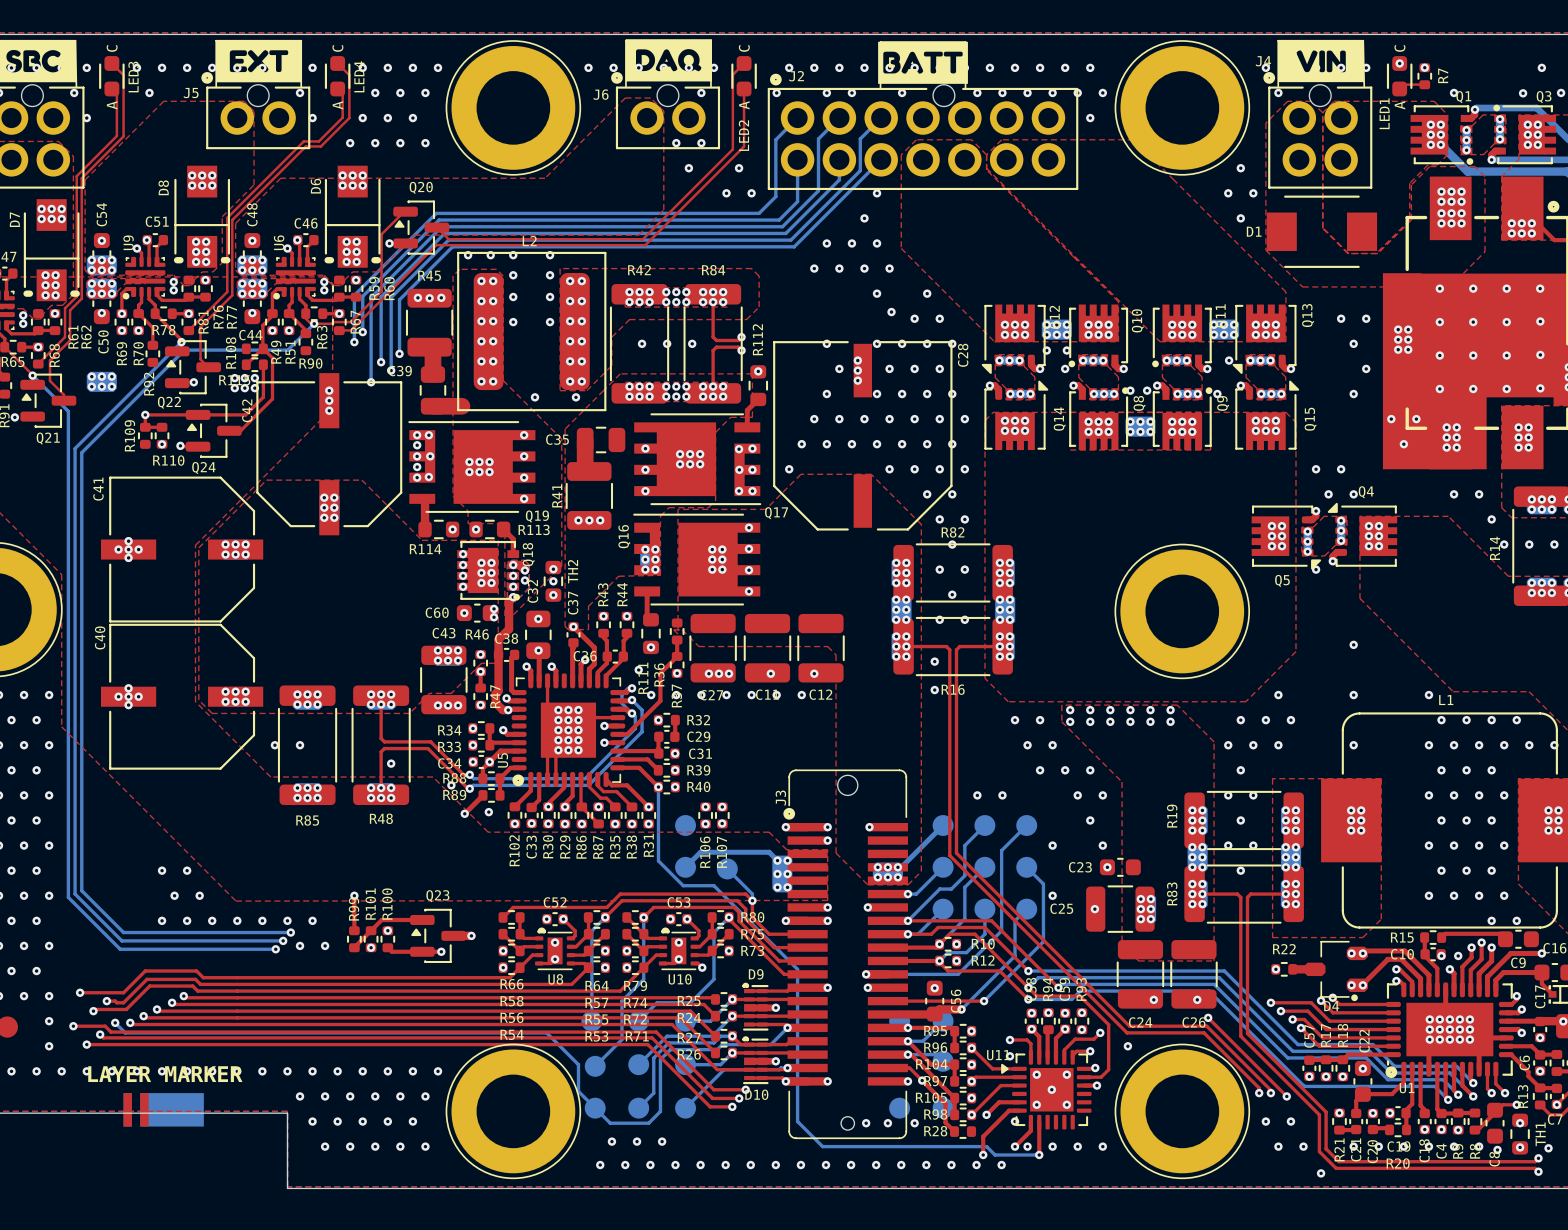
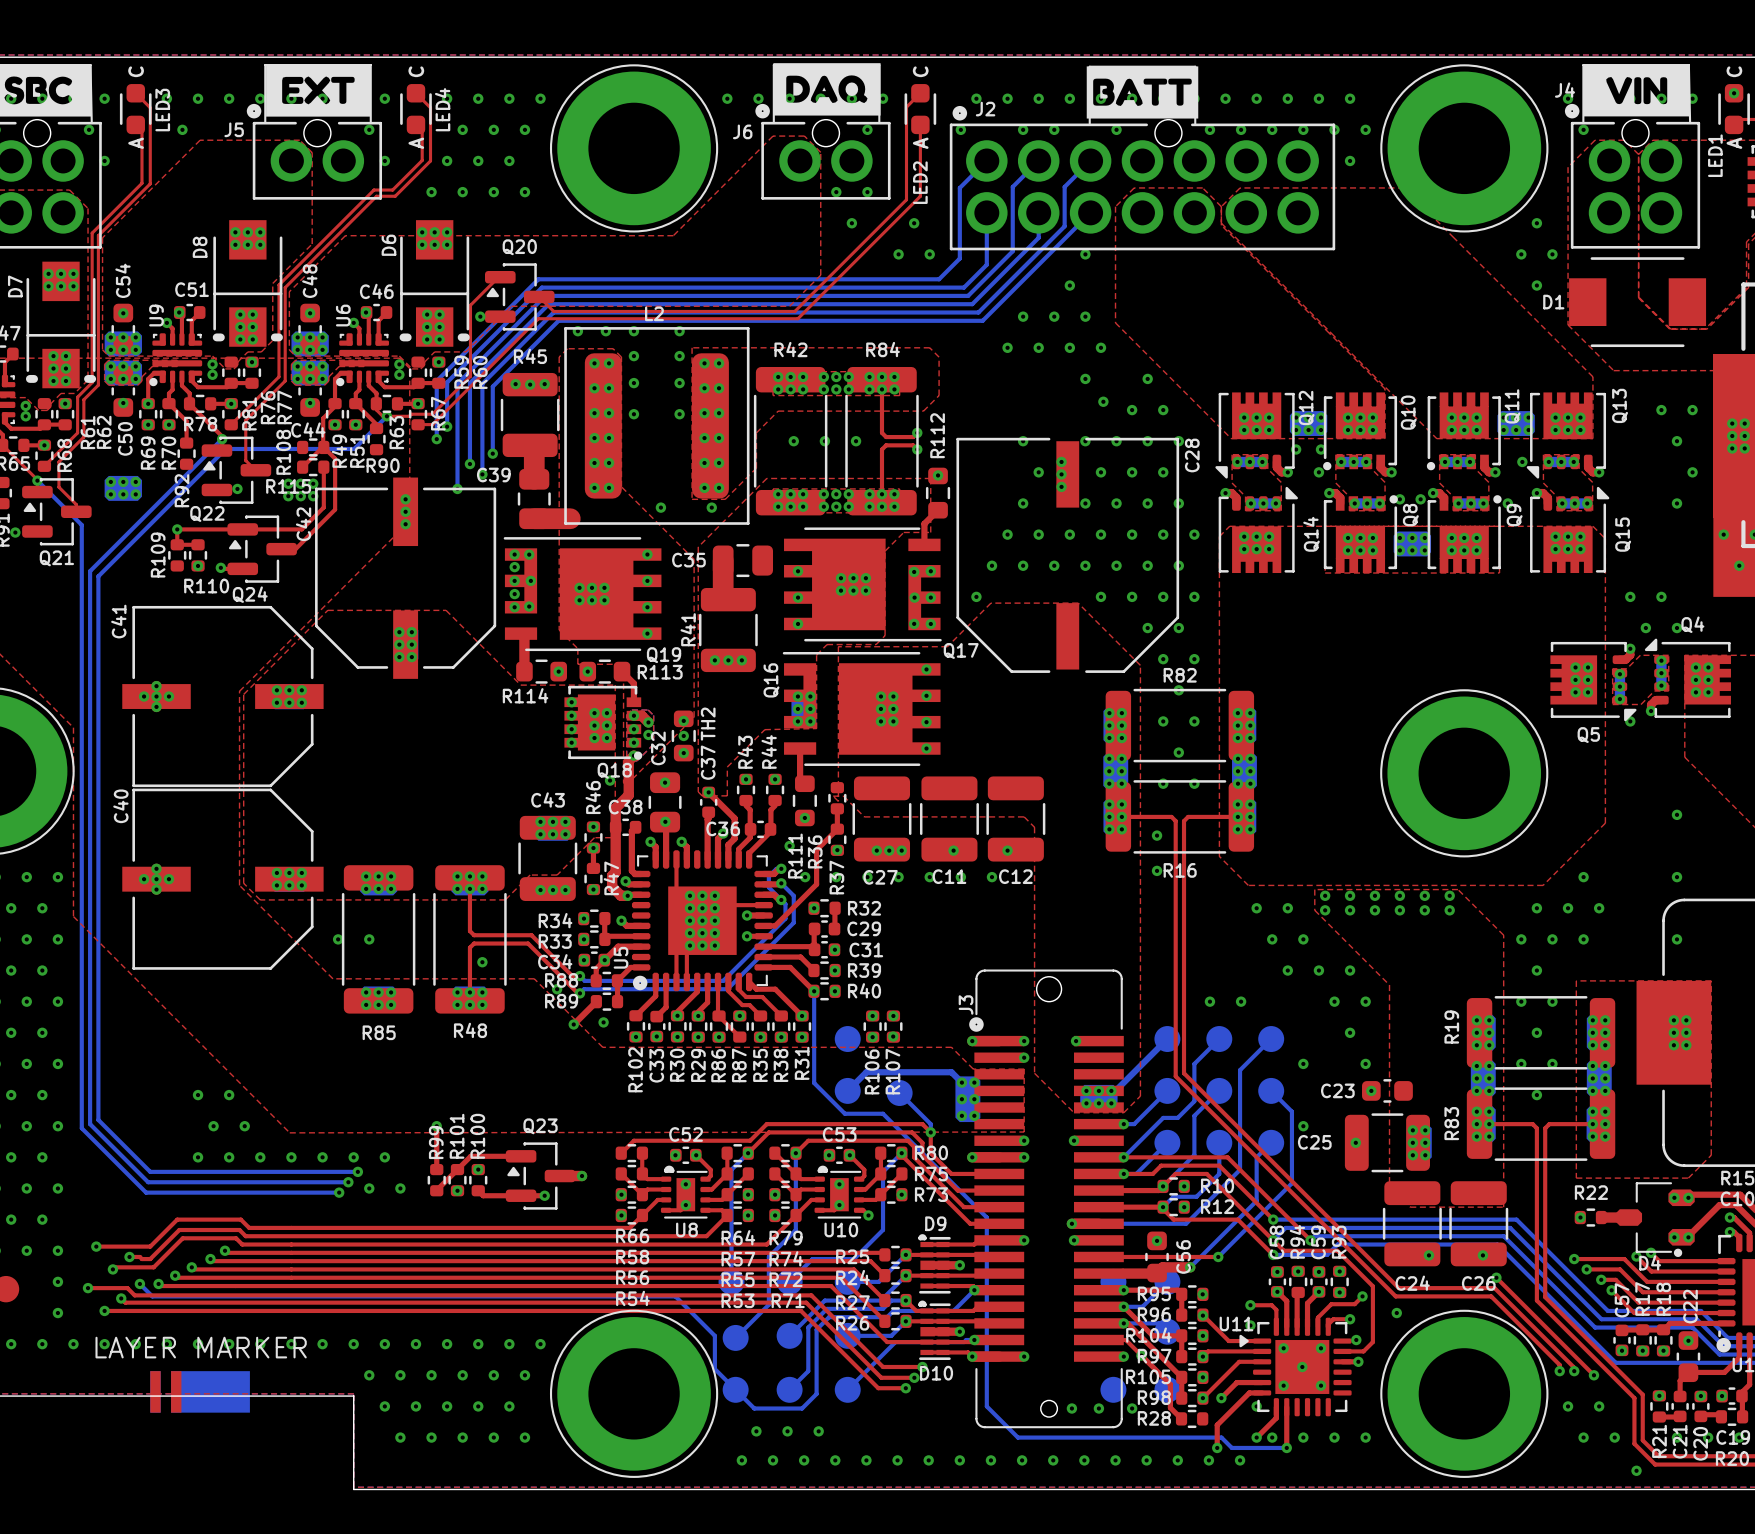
Q18 name rotation: 0° (528, 554) -> 90° clockwise (614, 770)
Q18 name position: Q18 (528, 554) -> Q18 (614, 770)
via: (494, 608) -> none
via: (464, 613) -> none
C60: (477, 613) -> none
R46 name rotation: 0° (477, 634) -> 90° counterclockwise (593, 797)

